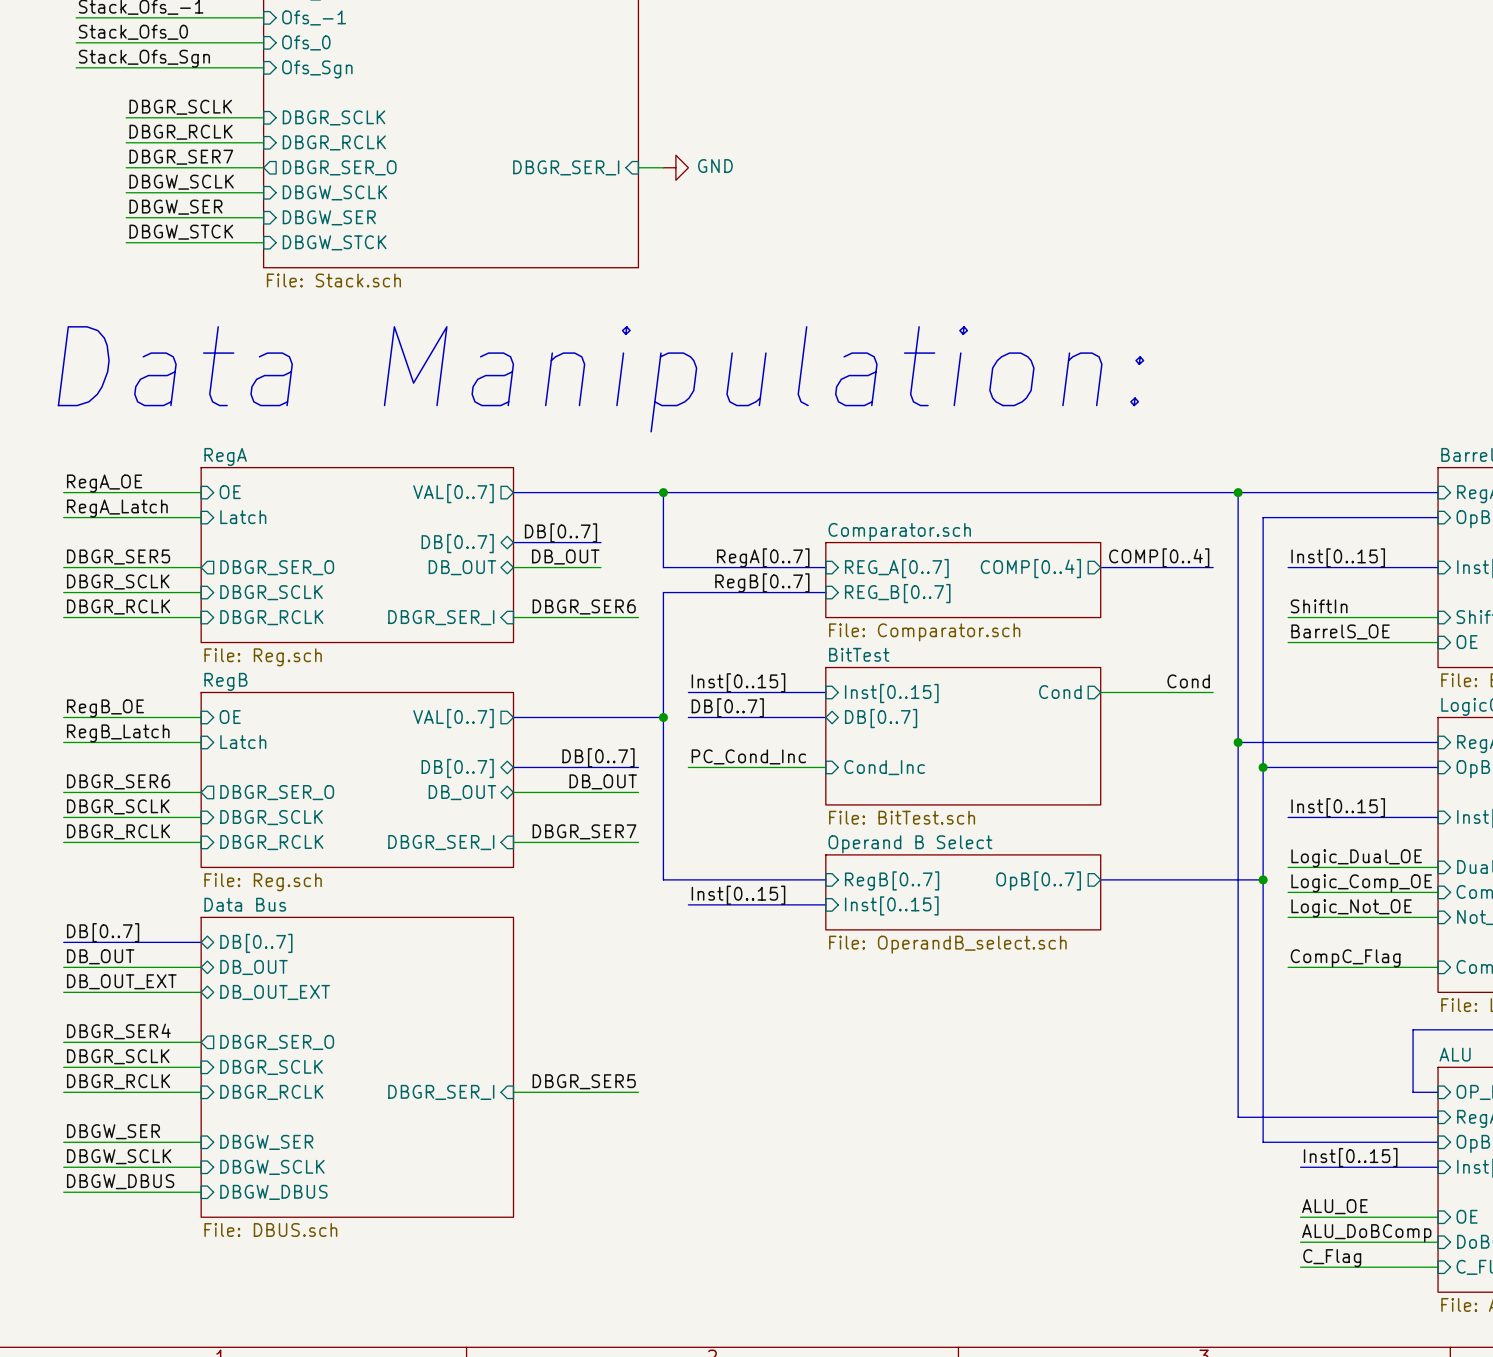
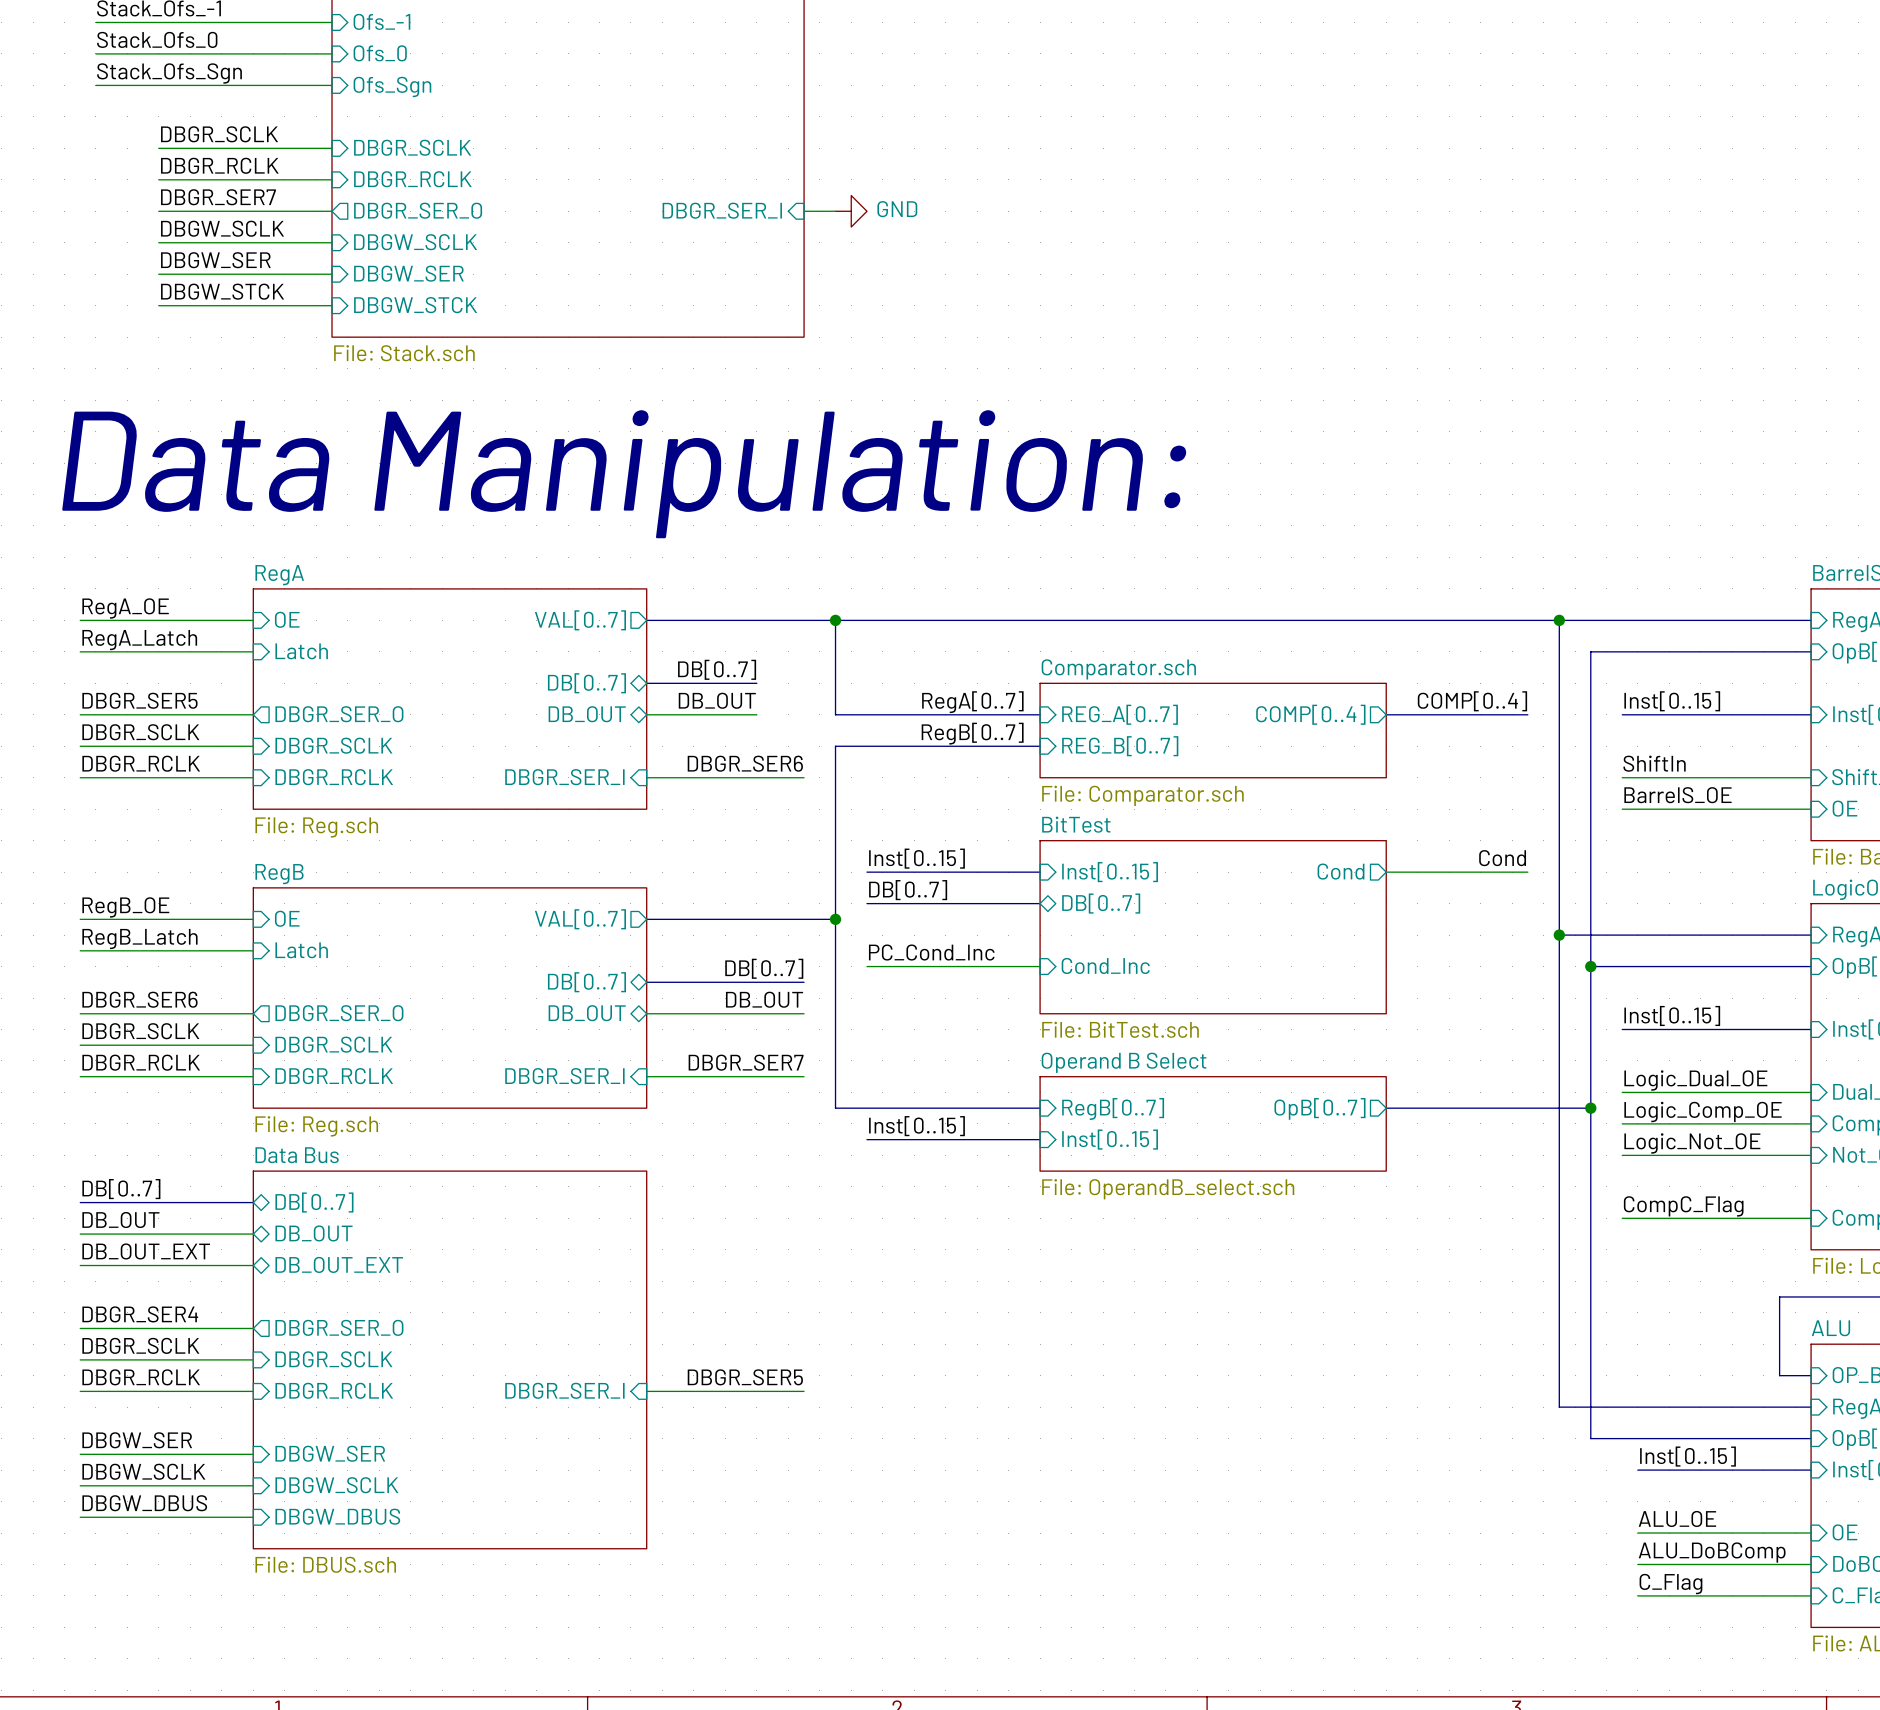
label position: RegB_OE (105, 708) -> RegB_OE (125, 907)
wire: (63, 717) (201, 717) -> (80, 919) (253, 919)
sheet pin position: OE (230, 717) -> OE (287, 918)
bus: (513, 717) (663, 717) -> (646, 919) (835, 919)
junction position: (663, 717) -> (835, 919)
sheet pin position: VAL[0..7] (453, 718) -> VAL[0..7] (580, 919)
label position: RegB_Latch (118, 733) -> RegB_Latch (139, 939)
wire: (63, 742) (201, 742) -> (80, 950) (253, 950)
sheet pin position: Latch (243, 742) -> Latch (301, 950)
label position: DB[0..7] (598, 757) -> DB[0..7] (764, 968)
bus: (513, 767) (638, 767) -> (646, 982) (804, 982)
sheet pin position: DB[0..7] (457, 768) -> DB[0..7] (586, 982)
sheet RegB position: (357, 779) -> (450, 998)
label position: DBGR_SER6 (118, 781) -> DBGR_SER6 (139, 999)
label position: DB_OUT (603, 781) -> DB_OUT (764, 999)
wire: (63, 792) (201, 792) -> (80, 1013) (253, 1013)
sheet pin position: DBGR_SER_O (277, 792) -> DBGR_SER_O (339, 1013)
sheet pin position: DB_OUT (462, 792) -> DB_OUT (587, 1013)
wire: (513, 792) (638, 792) -> (646, 1013) (804, 1013)
label position: DBGR_SCLK (118, 806) -> DBGR_SCLK (140, 1031)
wire: (63, 817) (201, 817) -> (80, 1045) (253, 1045)
sheet pin position: DBGR_SCLK (271, 817) -> DBGR_SCLK (333, 1044)
label position: DBGR_RCLK (118, 831) -> DBGR_RCLK (141, 1062)
label position: DBGR_SER7 (584, 831) -> DBGR_SER7 (746, 1062)
wire: (63, 842) (201, 842) -> (80, 1076) (253, 1076)
sheet pin position: DBGR_RCLK (271, 842) -> DBGR_RCLK (334, 1076)
sheet pin position: DBGR_SER_I (441, 842) -> DBGR_SER_I (564, 1076)
wire: (513, 842) (638, 842) -> (646, 1076) (804, 1076)
label position: DB[0..7] (103, 932) -> DB[0..7] (121, 1189)
bus: (63, 942) (201, 942) -> (80, 1202) (253, 1202)
sheet pin position: DB[0..7] (256, 943) -> DB[0..7] (314, 1202)
label position: DB_OUT (100, 956) -> DB_OUT (120, 1220)
wire: (63, 967) (201, 967) -> (80, 1234) (253, 1234)
sheet pin position: DB_OUT (254, 967) -> DB_OUT (313, 1233)
label position: DB_OUT_EXT (121, 981) -> DB_OUT_EXT (146, 1251)
wire: (63, 992) (201, 992) -> (80, 1265) (253, 1265)
sheet pin position: DB_OUT_EXT (275, 992) -> DB_OUT_EXT (339, 1264)
label position: DBGR_SER4 (118, 1031) -> DBGR_SER4 (140, 1314)
wire: (63, 1042) (201, 1042) -> (80, 1328) (253, 1328)
sheet pin position: DBGR_SER_O (277, 1042) -> DBGR_SER_O (339, 1327)
label position: DBGR_SCLK (118, 1056) -> DBGR_SCLK (140, 1345)
wire: (63, 1067) (201, 1067) -> (80, 1359) (253, 1359)
sheet pin position: DBGR_SCLK (271, 1067) -> DBGR_SCLK (333, 1359)
sheet Data Bus position: (357, 1067) -> (450, 1359)
label position: DBGR_RCLK (118, 1081) -> DBGR_RCLK (141, 1377)
label position: DBGR_SER5 (584, 1081) -> DBGR_SER5 (745, 1377)
wire: (63, 1092) (201, 1092) -> (80, 1391) (253, 1391)
sheet pin position: DBGR_RCLK (271, 1092) -> DBGR_RCLK (334, 1390)
sheet pin position: DBGR_SER_I (441, 1092) -> DBGR_SER_I (564, 1390)
wire: (513, 1092) (638, 1092) -> (646, 1391) (804, 1391)
label position: DBGW_SER (113, 1131) -> DBGW_SER (137, 1440)
wire: (63, 1142) (201, 1142) -> (80, 1454) (253, 1454)
sheet pin position: DBGW_SER (266, 1142) -> DBGW_SER (330, 1453)
label position: DBGW_SCLK (119, 1156) -> DBGW_SCLK (143, 1471)
wire: (63, 1167) (201, 1167) -> (80, 1485) (253, 1485)
sheet pin position: DBGW_SCLK (272, 1167) -> DBGW_SCLK (336, 1485)
label position: DBGW_DBUS (120, 1181) -> DBGW_DBUS (144, 1503)
wire: (63, 1192) (201, 1192) -> (80, 1517) (253, 1517)
sheet pin position: DBGW_DBUS (273, 1192) -> DBGW_DBUS (337, 1516)

